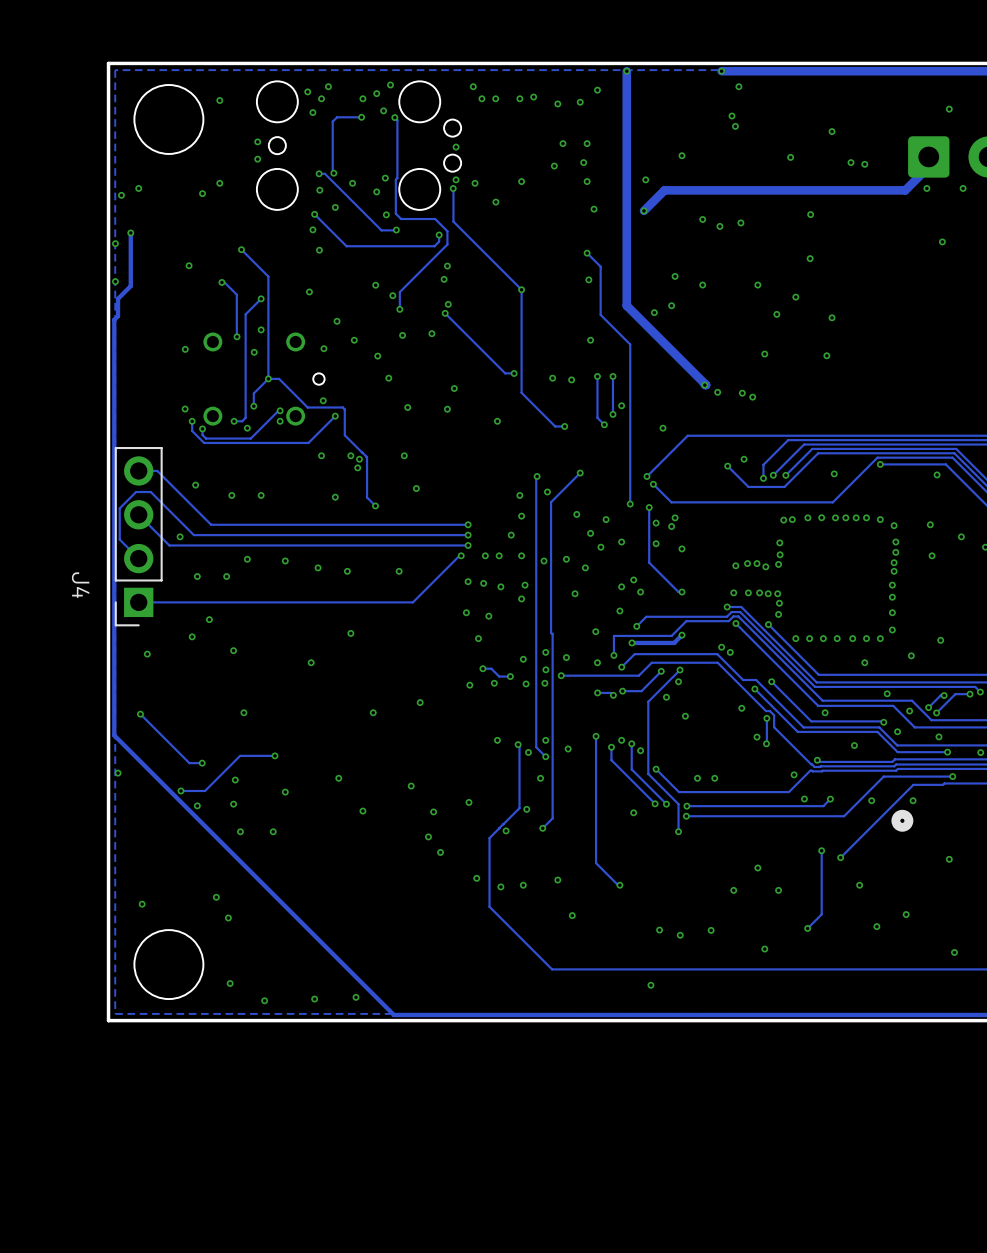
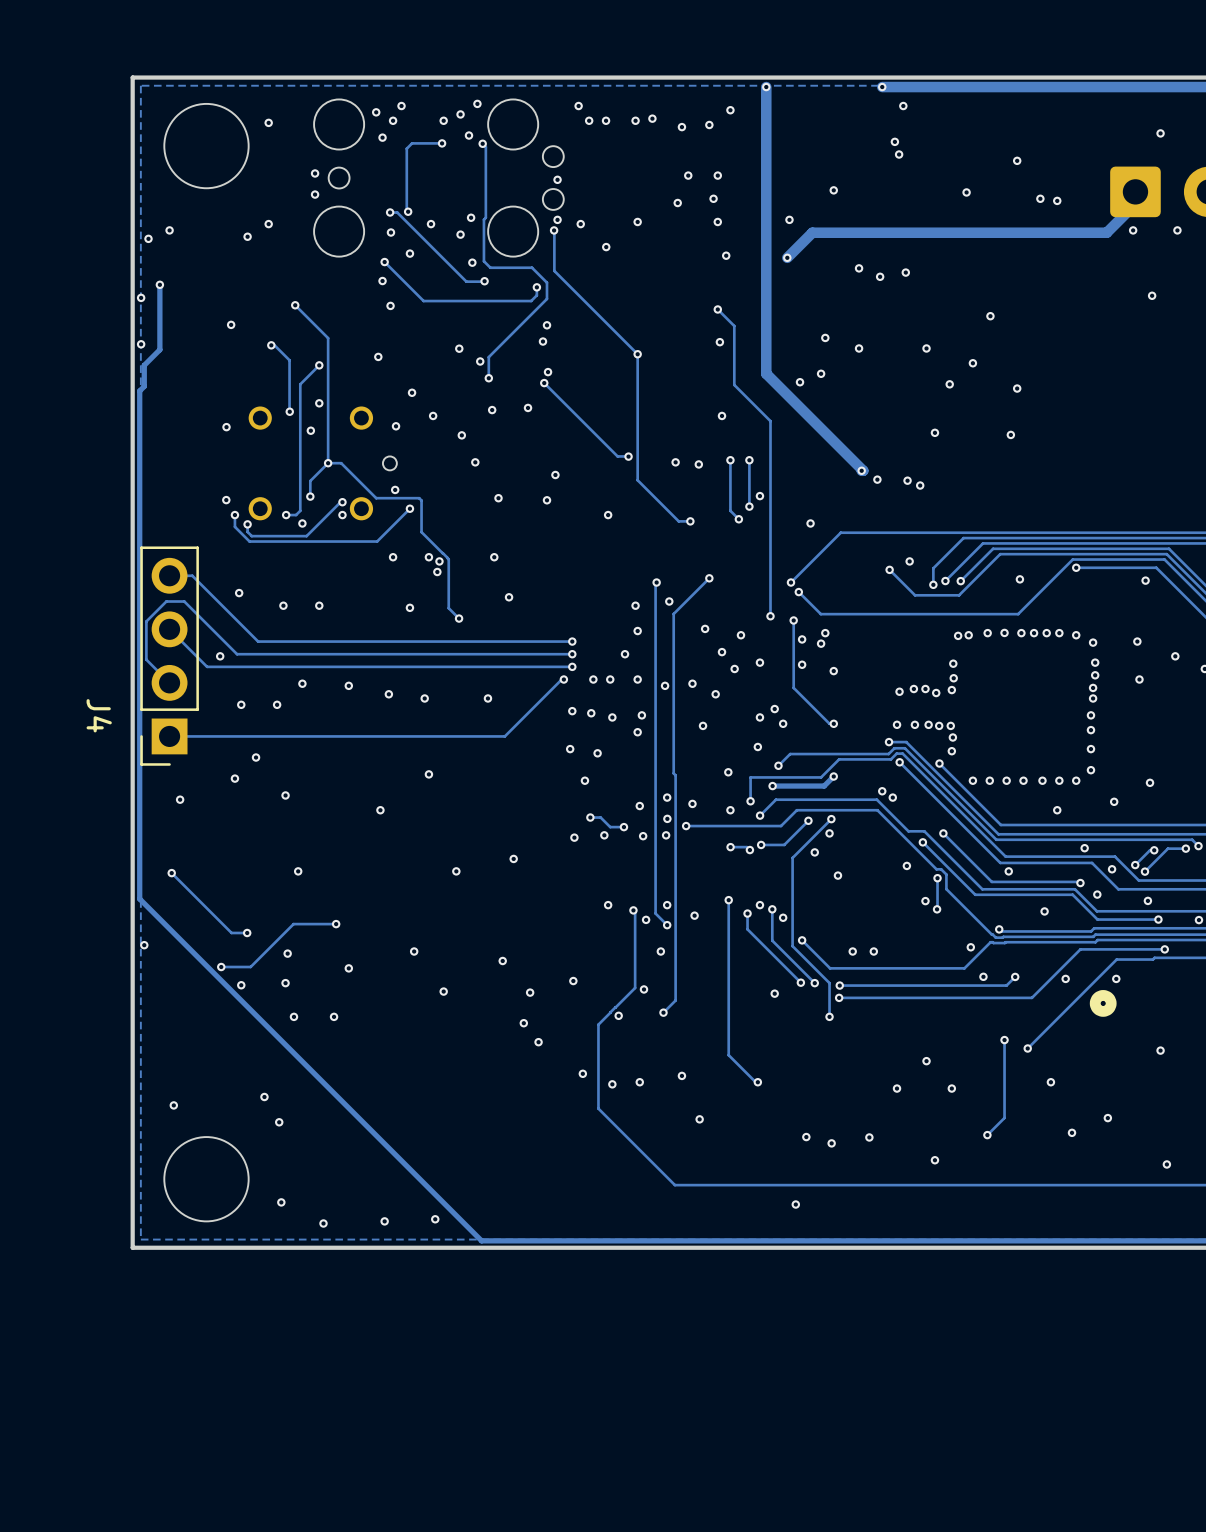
via: (810, 214) -> none

